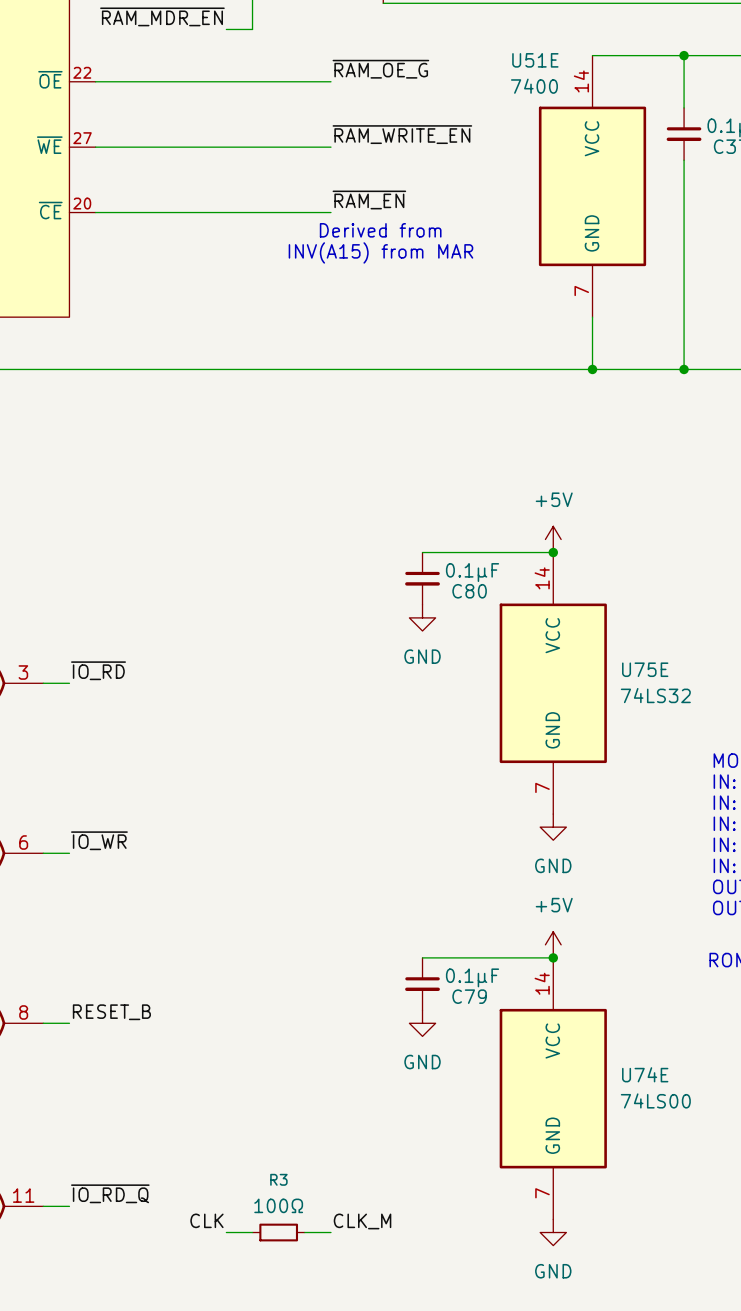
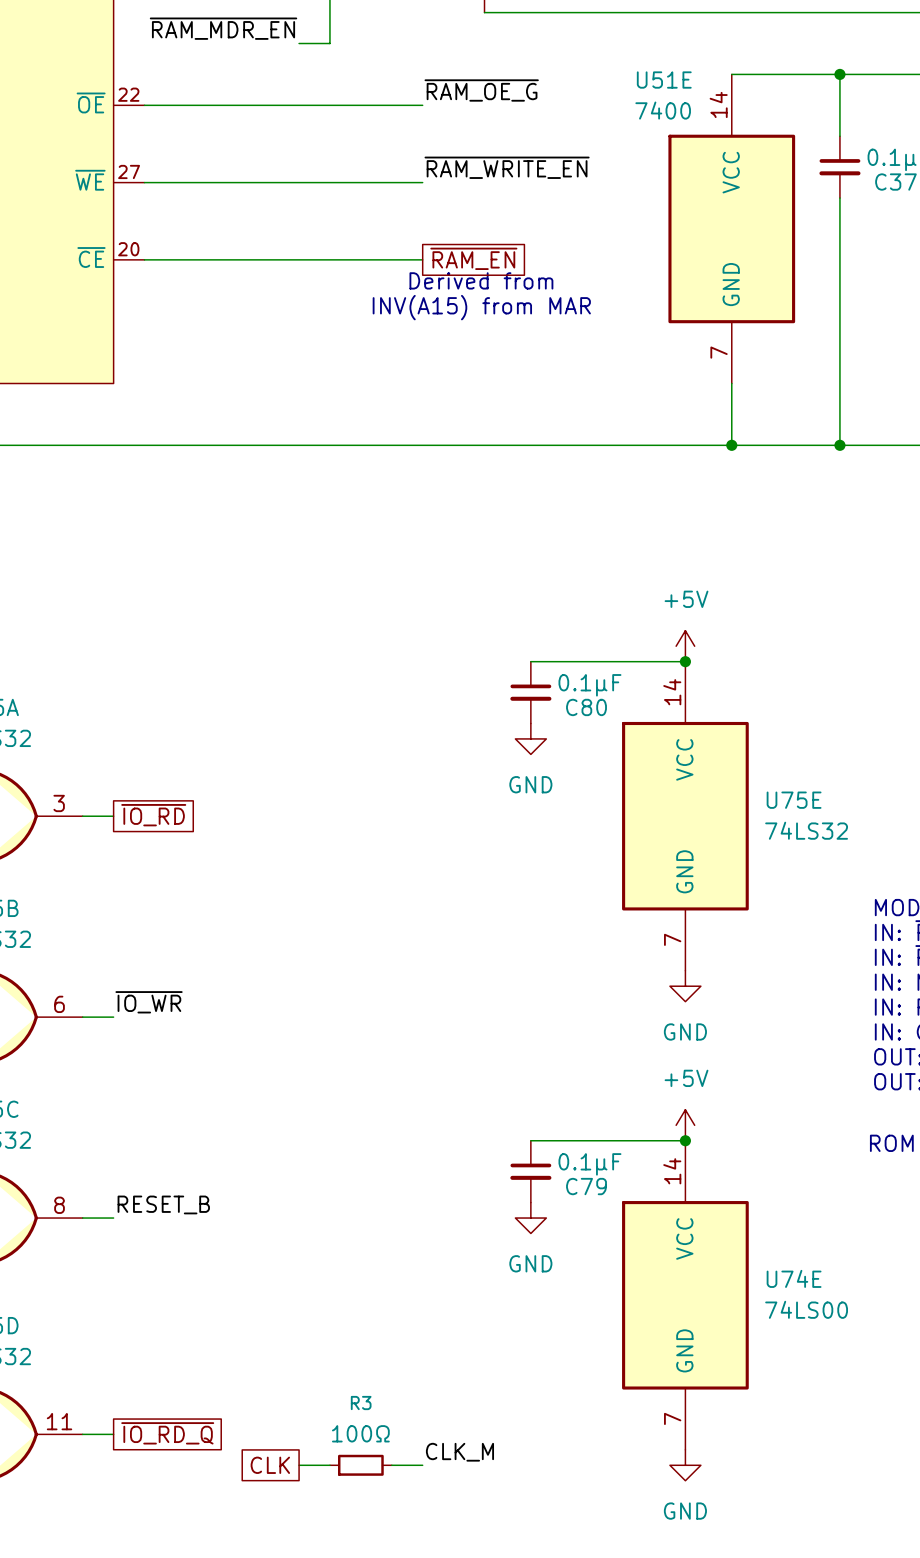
label: ~{RAM_EN} (369, 199) -> none
global label: none -> ~{RAM_EN} (473, 258)
label: ~{IO_RD} (98, 670) -> none
global label: none -> ~{IO_RD} (153, 815)
label: ~{IO_RD_Q} (110, 1193) -> none
global label: none -> ~{IO_RD_Q} (167, 1433)
label: CLK (206, 1220) -> none
global label: none -> CLK (270, 1465)

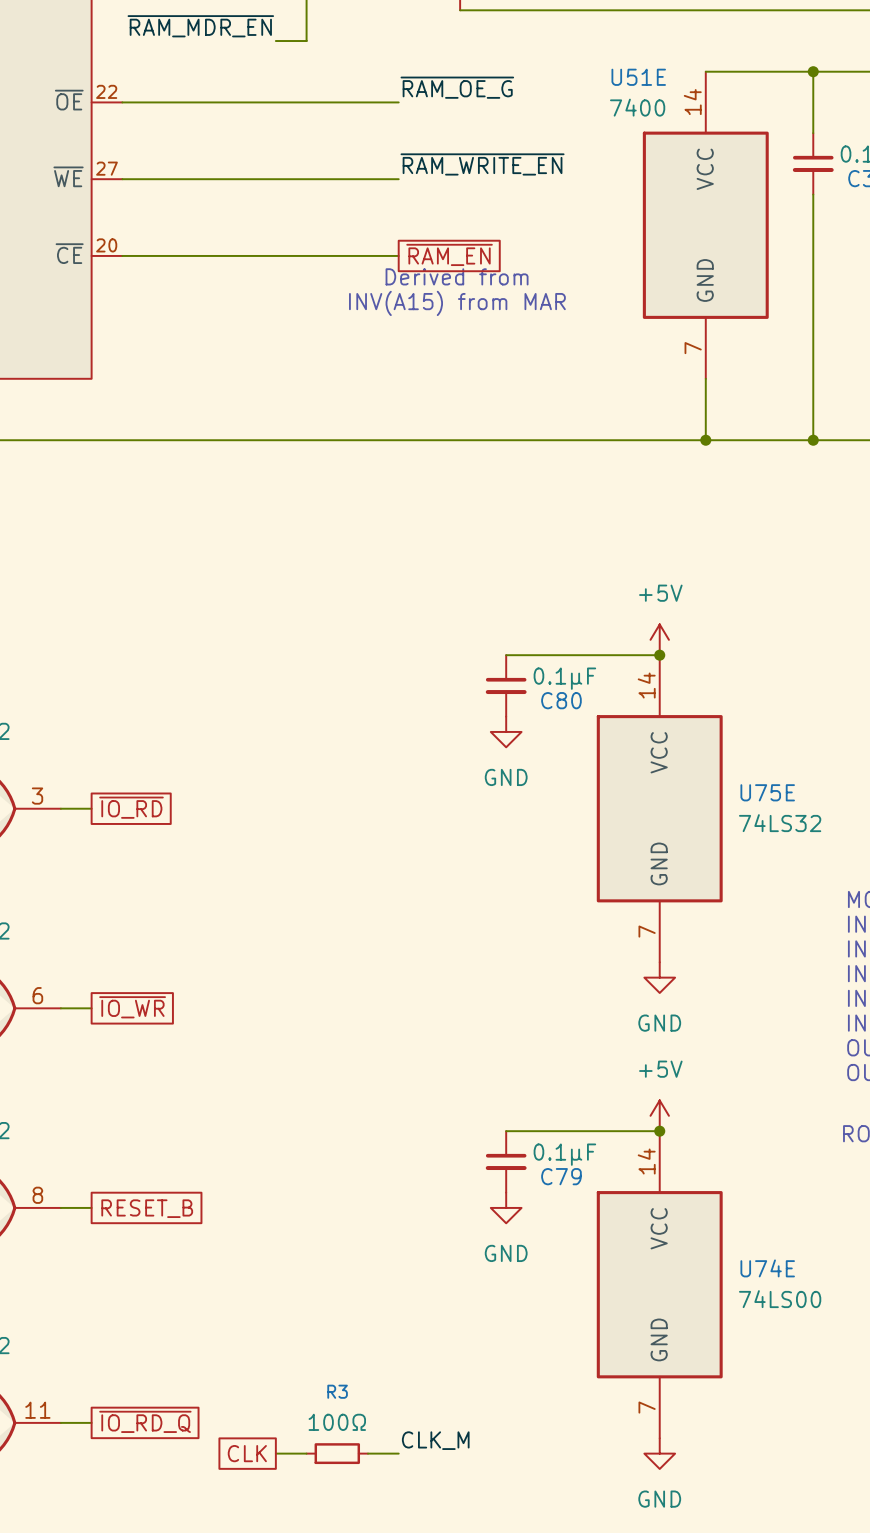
label: ~{IO_WR} (149, 1002) -> none
global label: none -> ~{IO_WR} (132, 1007)
label: RESET_B (163, 1204) -> none
global label: none -> RESET_B (147, 1208)

